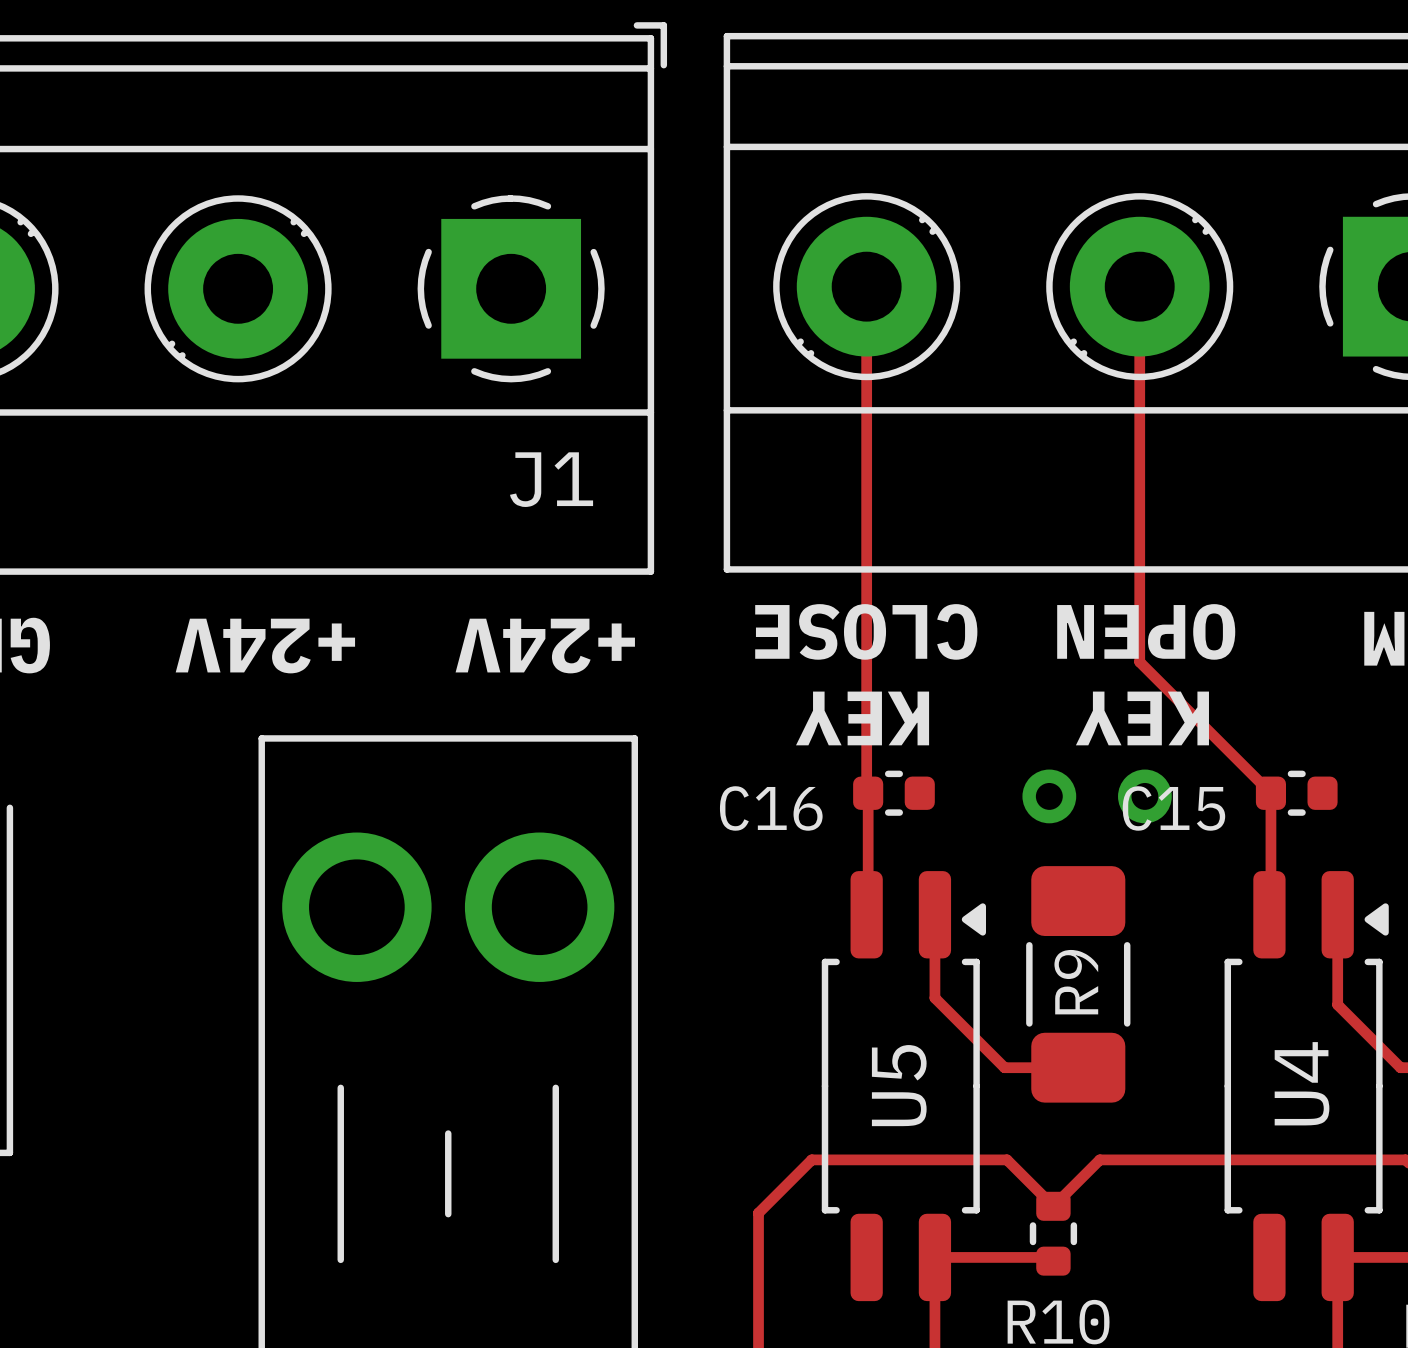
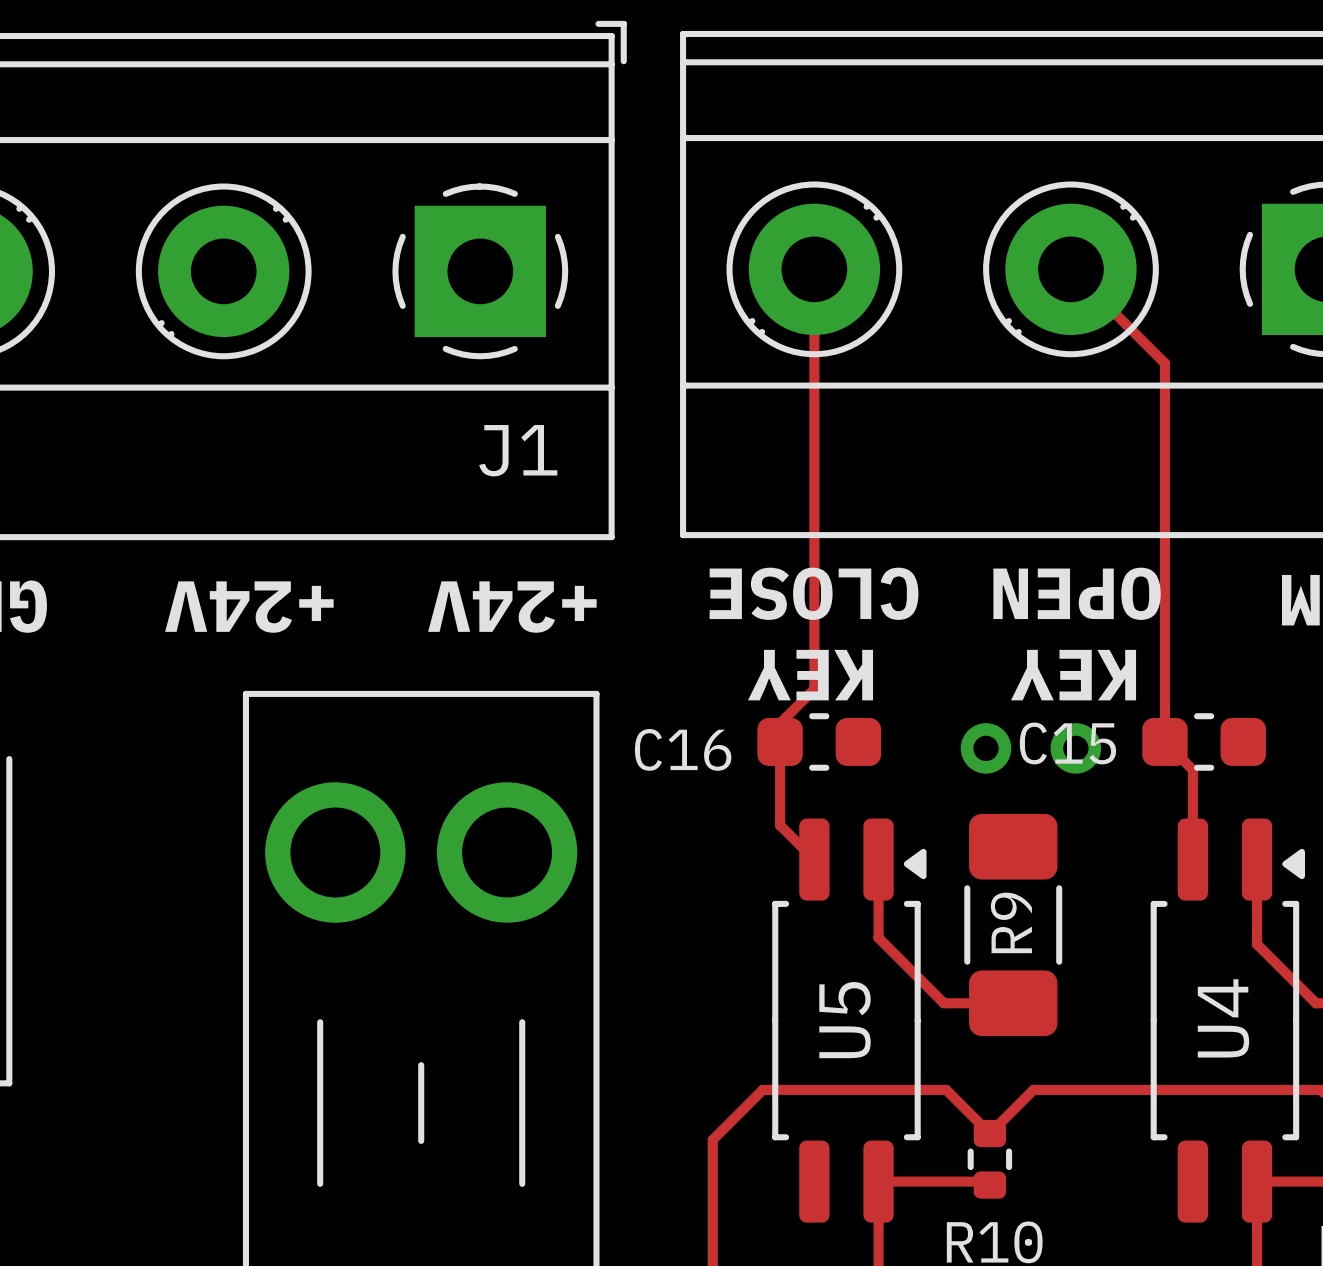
track: (1139, 286) (1139, 662) (1270, 793) (1270, 913) -> (1070, 269) (1164, 363) (1164, 741) (1192, 769) (1192, 859)
track: (866, 733) (868, 913) -> (814, 689) (780, 723) (780, 825) (814, 859)
C16 footprint: [853, 770, 935, 816] -> [757, 713, 882, 771]
C15 footprint: [1255, 770, 1338, 816] -> [1142, 713, 1267, 771]
C16 name position: C16 (771, 808) -> C16 (683, 749)
C15 name position: C15 (1173, 808) -> C15 (1067, 743)

